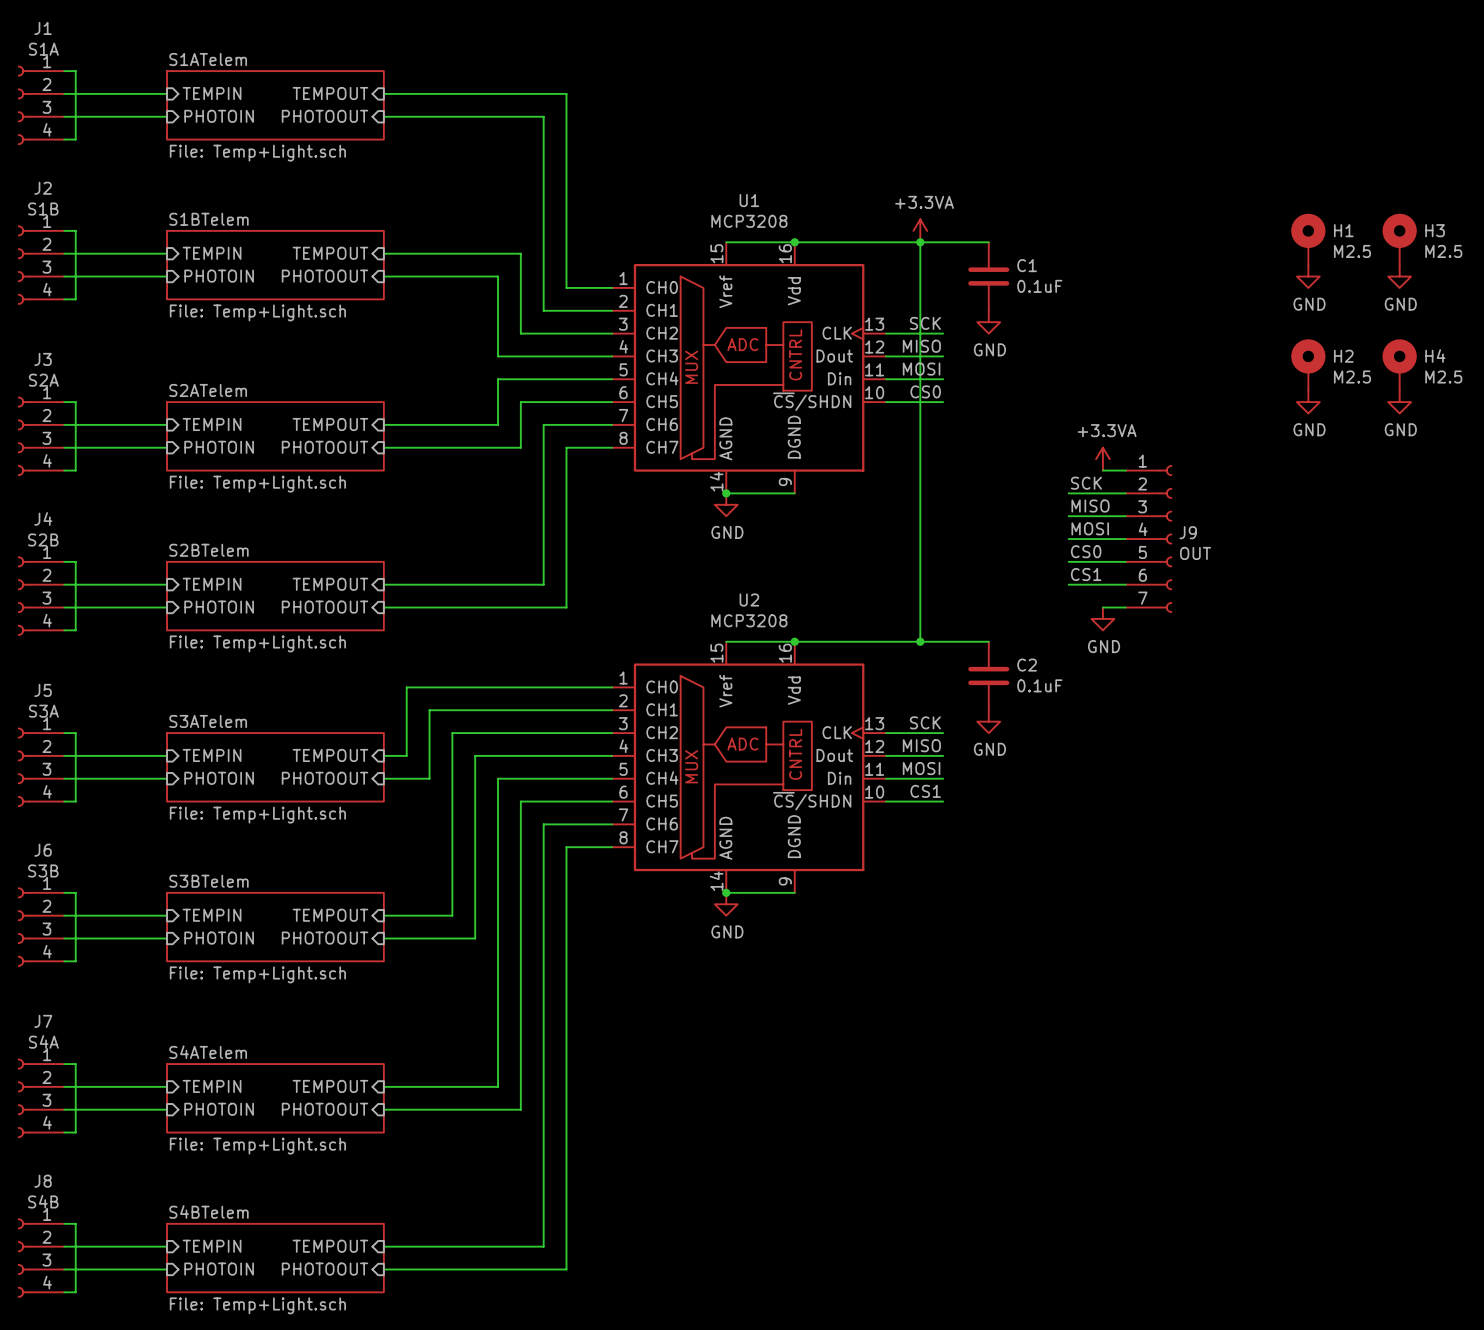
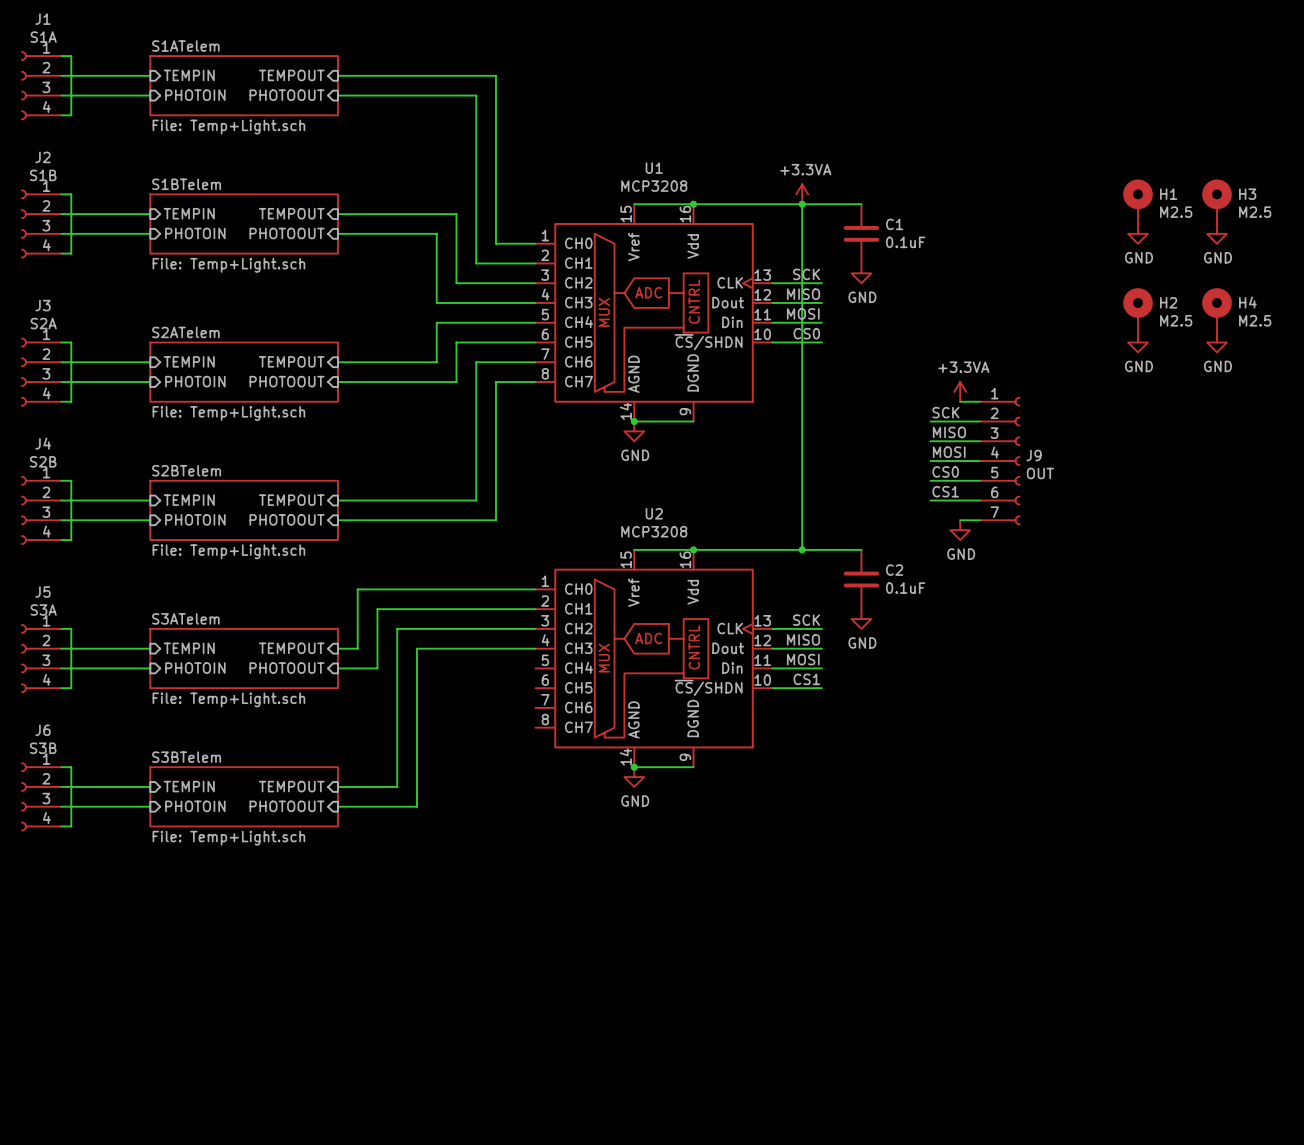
wire: (612, 778) (498, 778) (498, 1086) (383, 1086) -> none
wire: (612, 801) (520, 801) (520, 1109) (383, 1109) -> none
wire: (612, 824) (543, 824) (543, 1246) (383, 1246) -> none
wire: (612, 847) (566, 847) (566, 1269) (383, 1269) -> none
wire: (64, 1064) (75, 1064) (75, 1132) (64, 1132) -> none
wire: (64, 1086) (167, 1086) -> none
sheet pin: TEMPIN (212, 1086) -> none
sheet pin: TEMPOUT (330, 1086) -> none
J7: S4A (41, 1098) -> none
sheet S4ATelem: File: Temp+Light.sch (275, 1098) -> none
wire: (64, 1109) (167, 1109) -> none
sheet pin: PHOTOIN (219, 1109) -> none
sheet pin: PHOTOOUT (325, 1109) -> none
wire: (64, 1223) (75, 1223) (75, 1292) (64, 1292) -> none
wire: (64, 1246) (167, 1246) -> none
sheet pin: TEMPIN (212, 1246) -> none
sheet pin: TEMPOUT (330, 1246) -> none
J8: S4B (41, 1258) -> none
sheet S4BTelem: File: Temp+Light.sch (275, 1258) -> none
wire: (64, 1269) (167, 1269) -> none
sheet pin: PHOTOIN (219, 1269) -> none
sheet pin: PHOTOOUT (325, 1269) -> none

